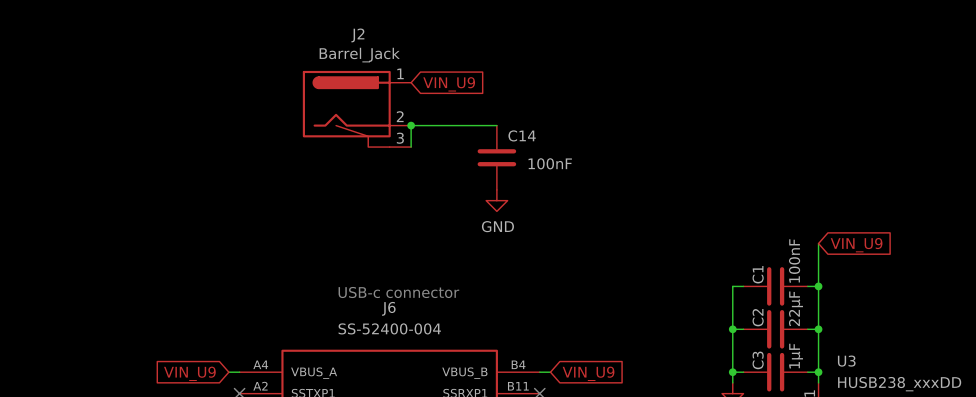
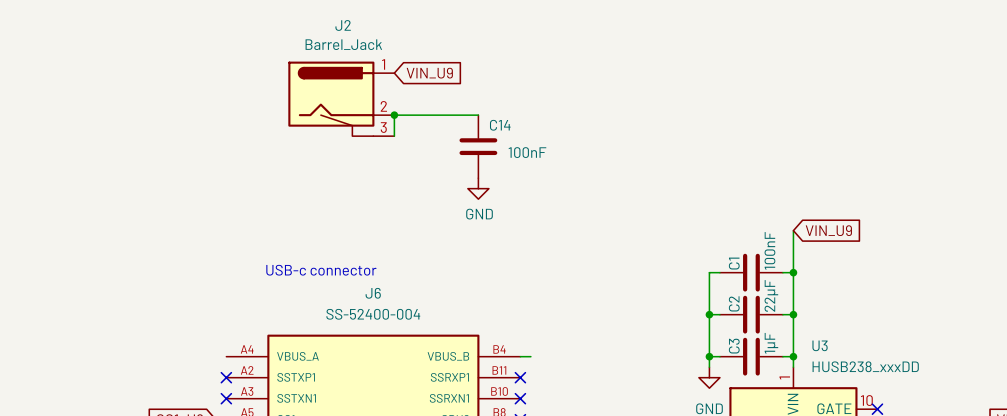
text position: USB-c connector (398, 292) -> USB-c connector (321, 270)
wire: (228, 372) (239, 372) -> none
global label: VIN_U9 (189, 373) -> none
global label: VIN_U9 (588, 373) -> none

